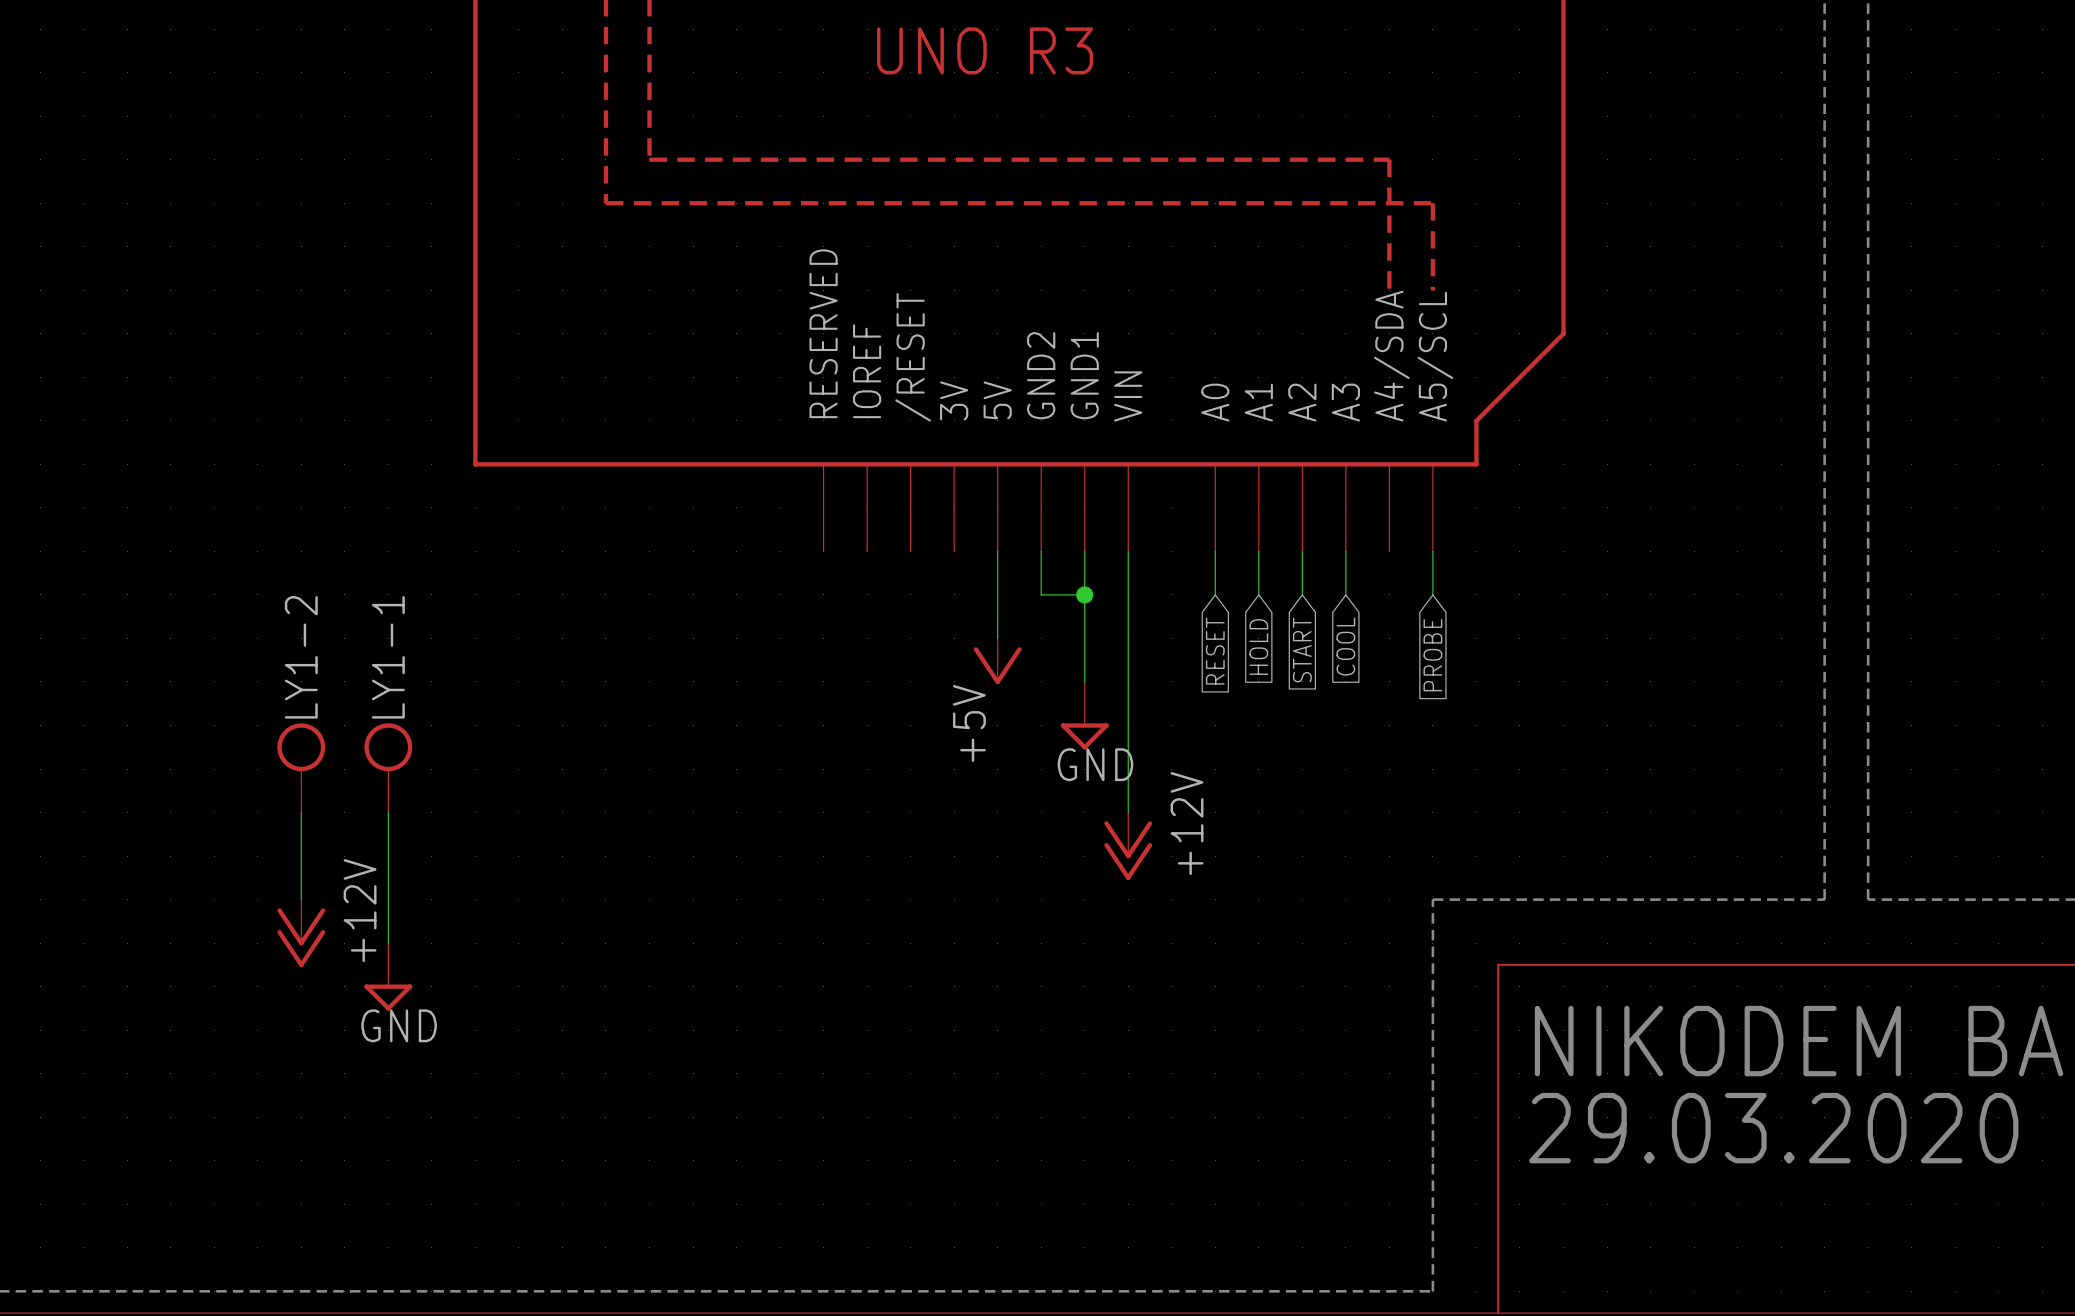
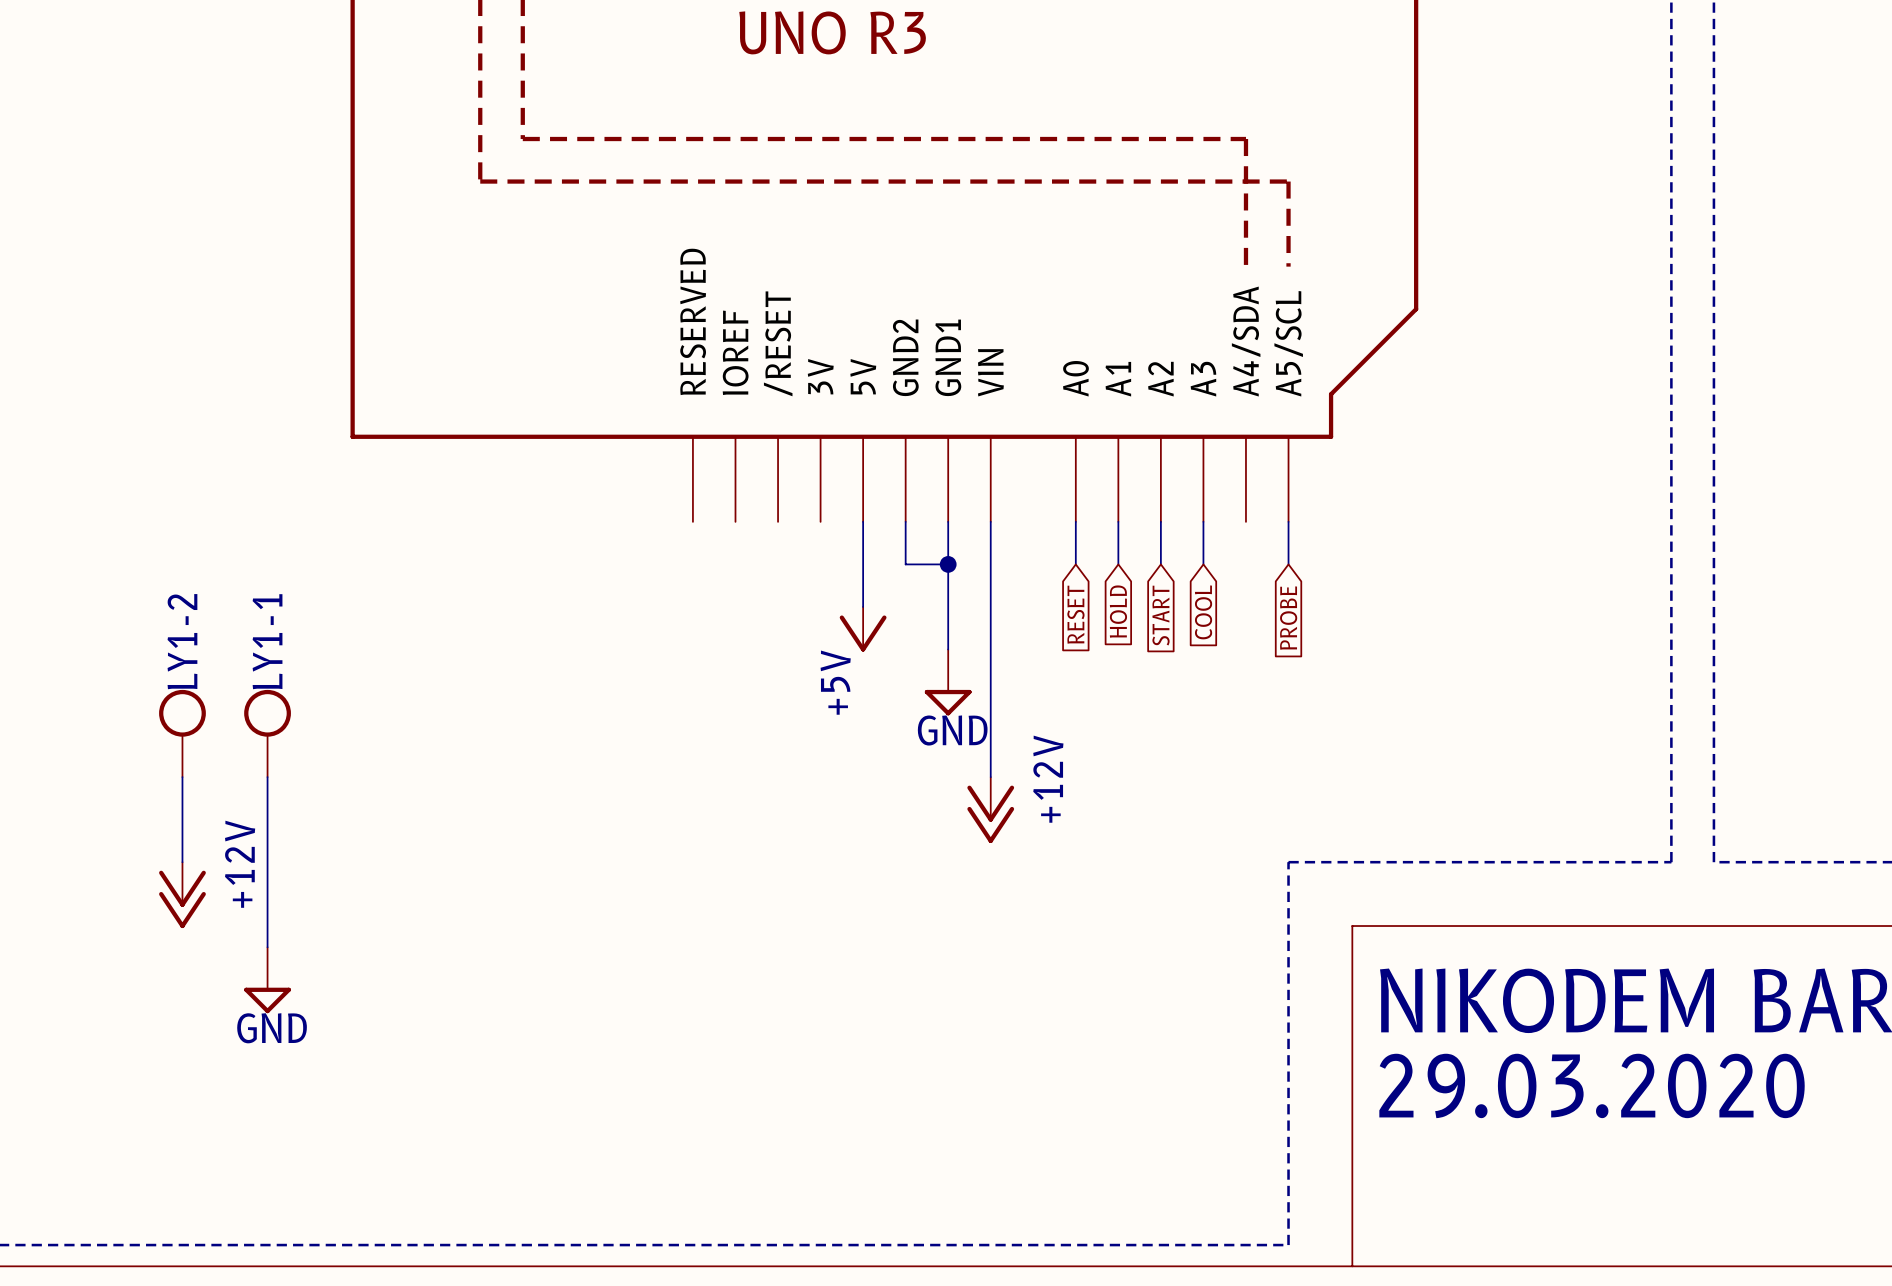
power symbol position: GND (388, 976) -> GND (267, 980)

